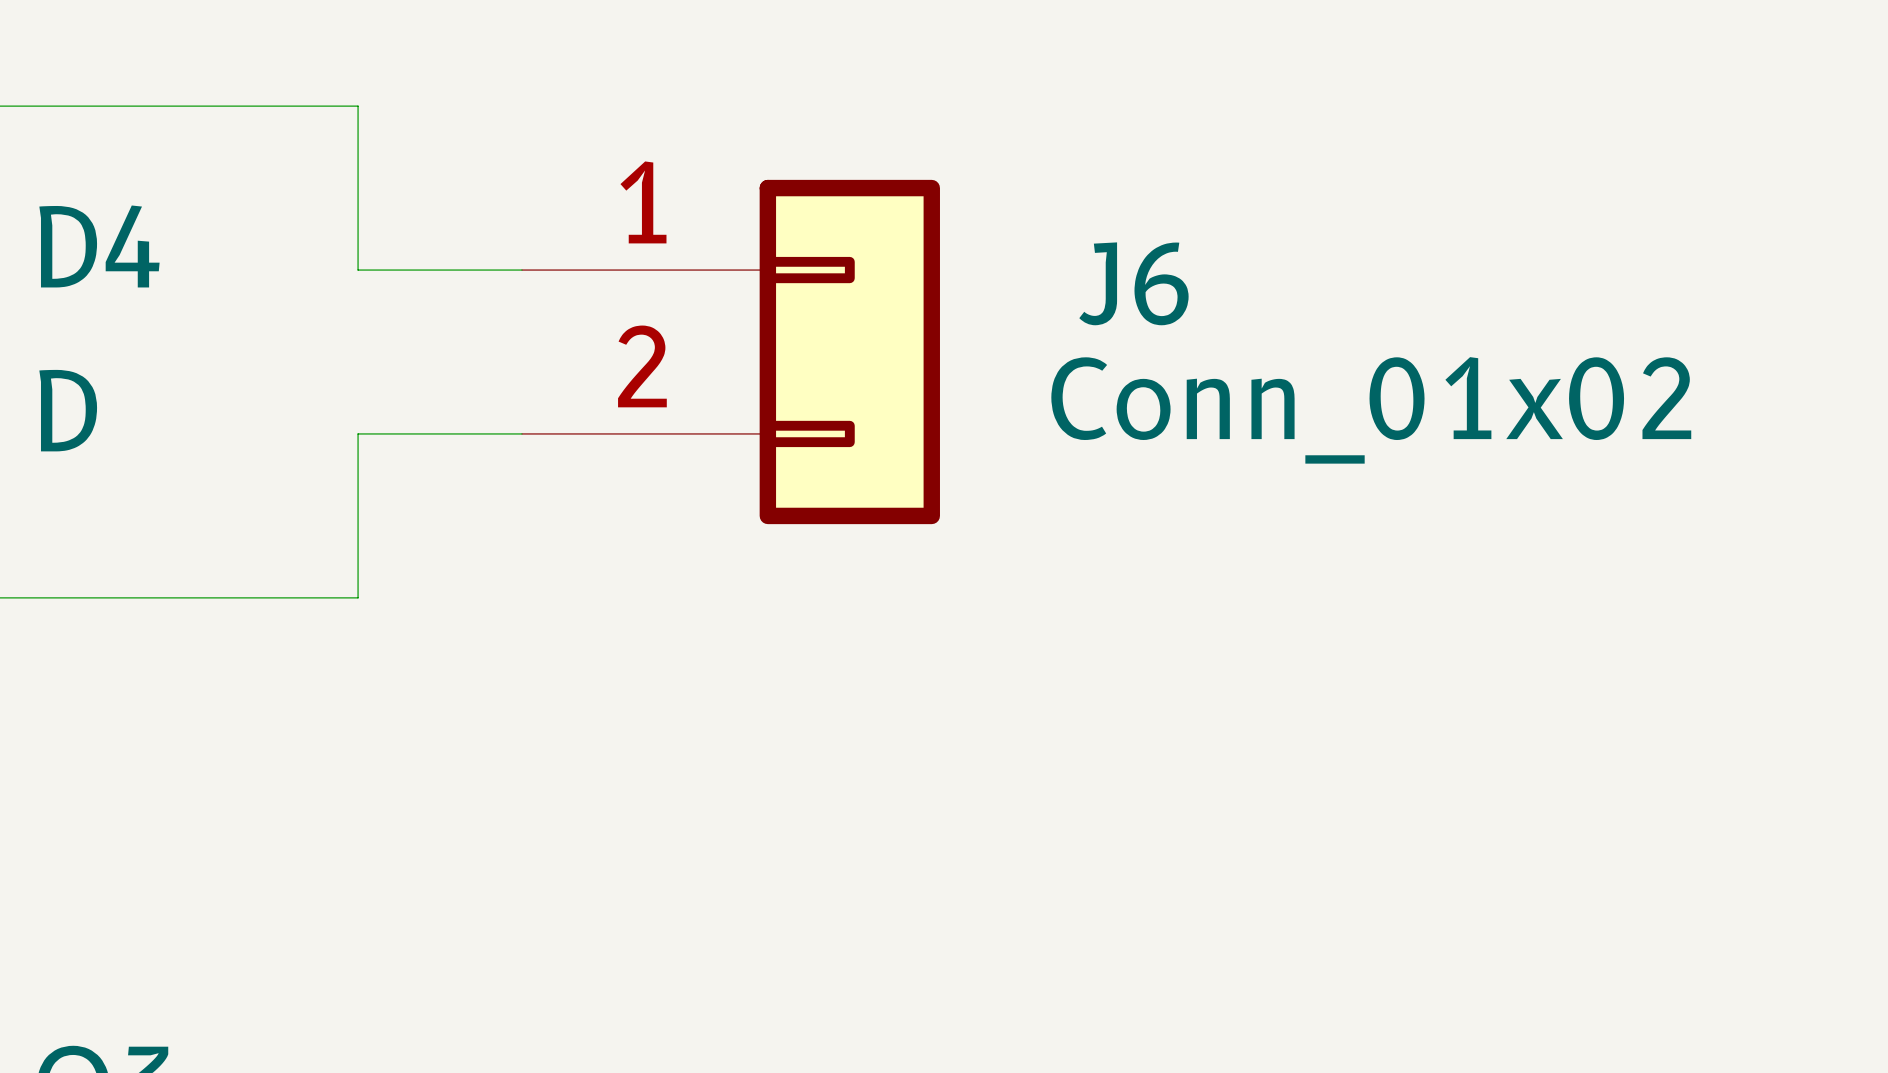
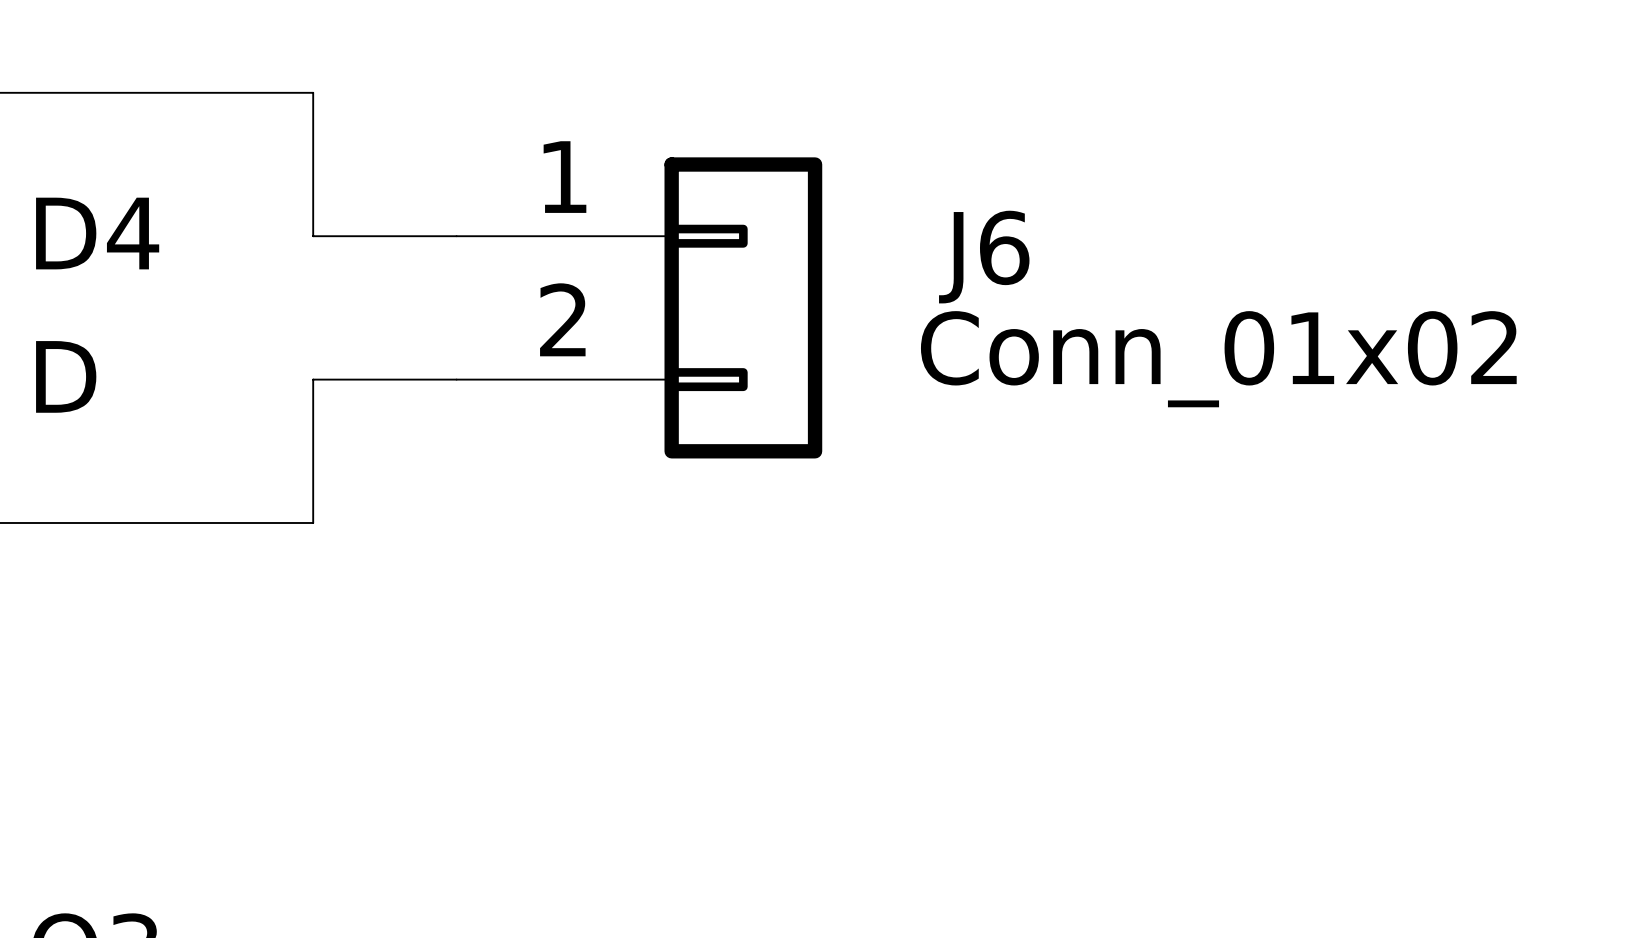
D4 name position: D4 (99, 246) -> D4 (97, 233)
D4 value position: D (68, 410) -> D (66, 376)

